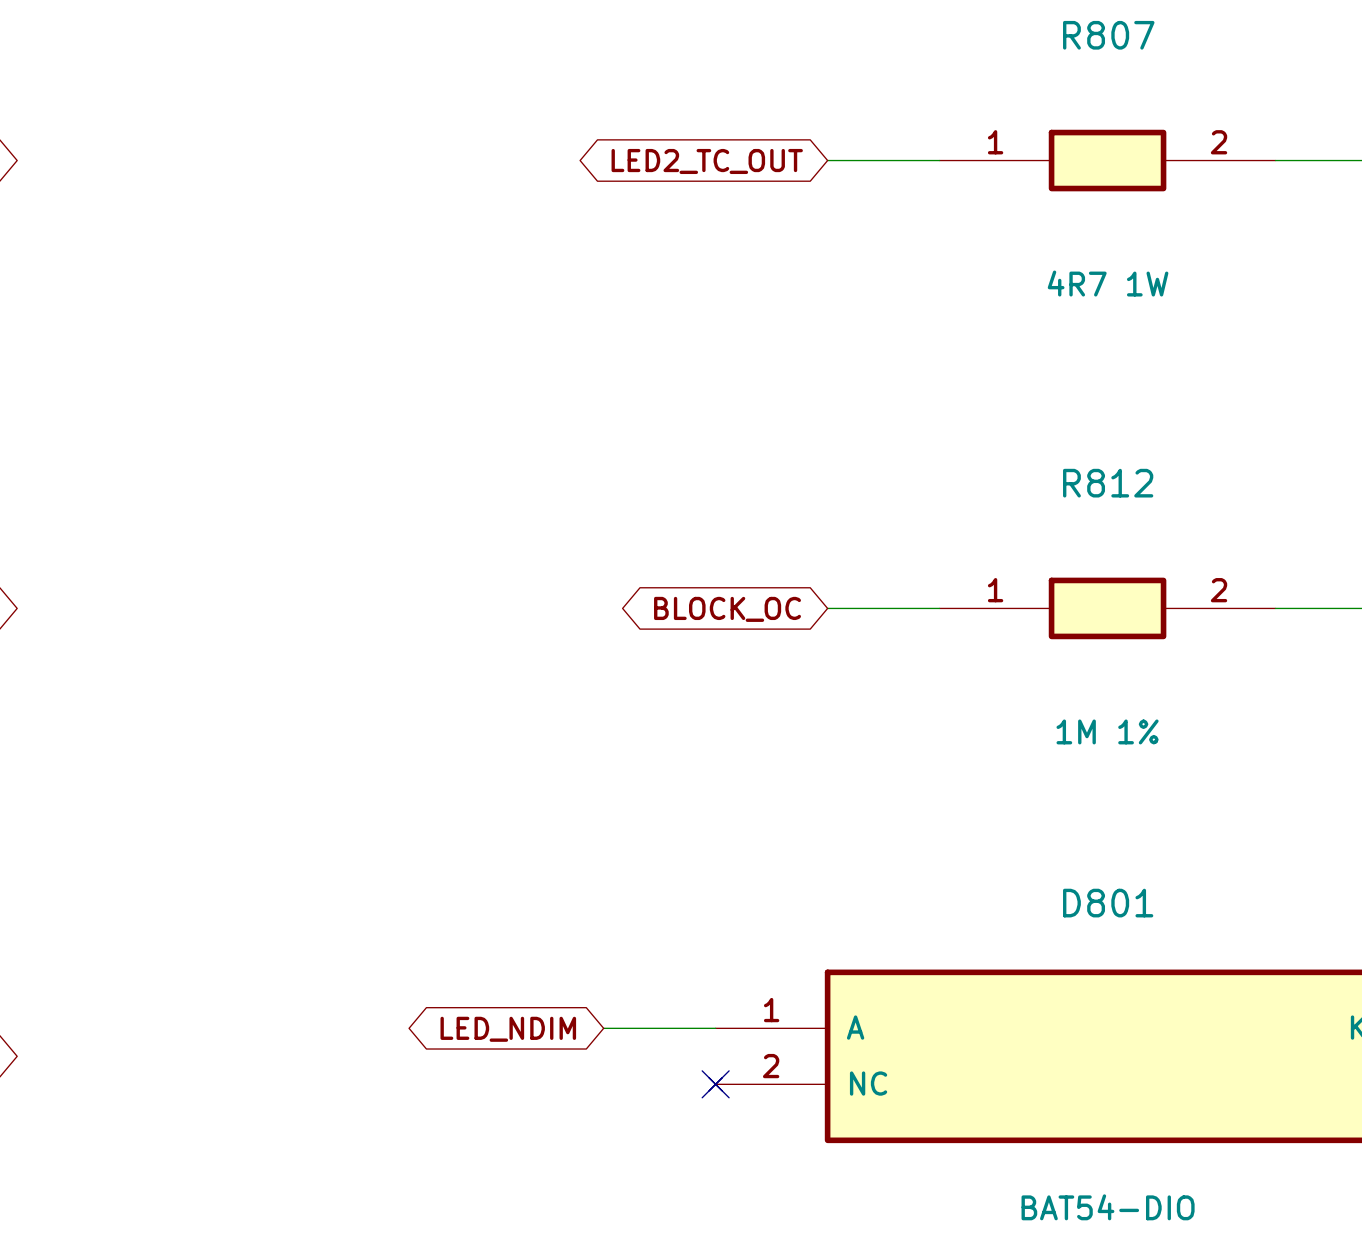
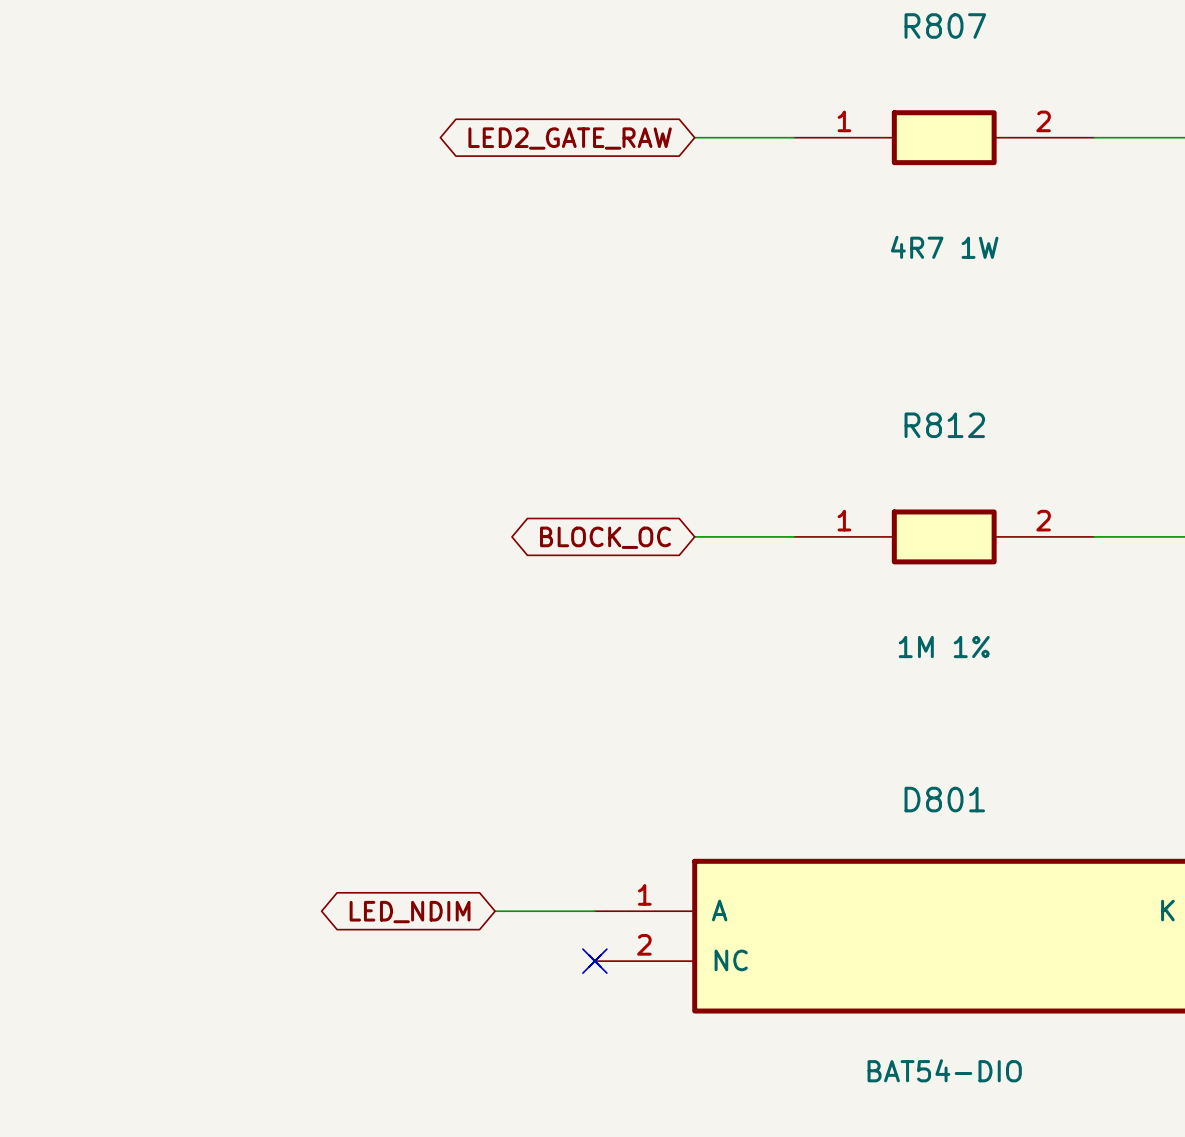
global label: LED2_TC_OUT (707, 161) -> LED2_GATE_RAW (570, 138)

